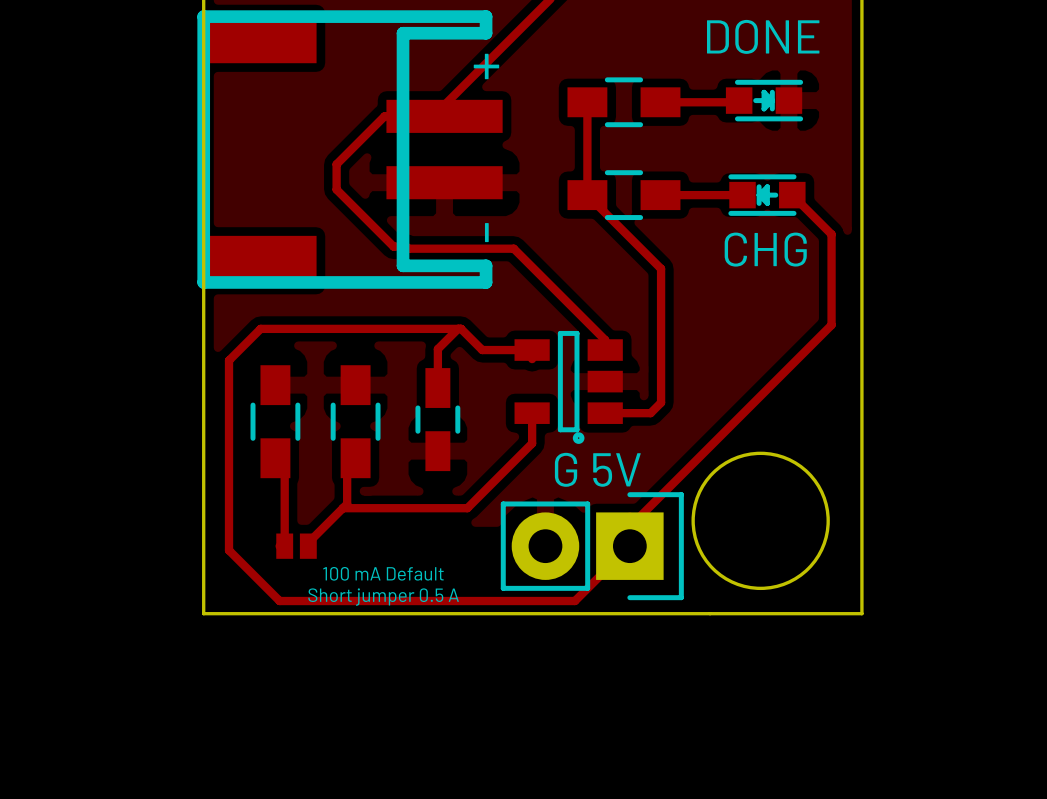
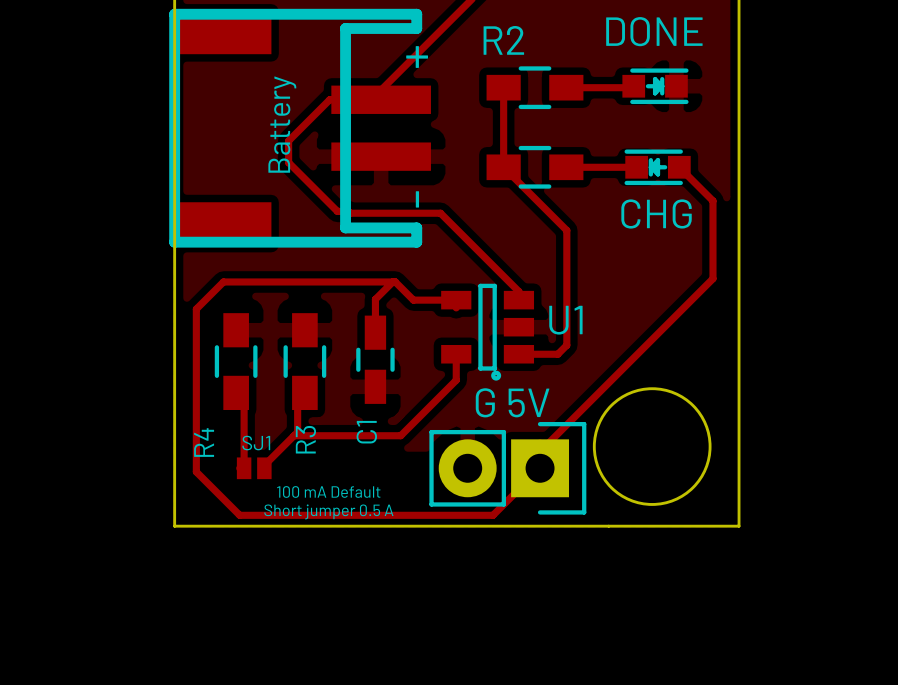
R2 name: none -> R2 (503, 40)
part value: none -> Battery (282, 124)
U1 name: none -> U1 (565, 320)
C1 name: none -> C1 (366, 432)
R3 name: none -> R3 (305, 439)
R4 name: none -> R4 (204, 442)
SJ1 name: none -> SJ1 (256, 443)

